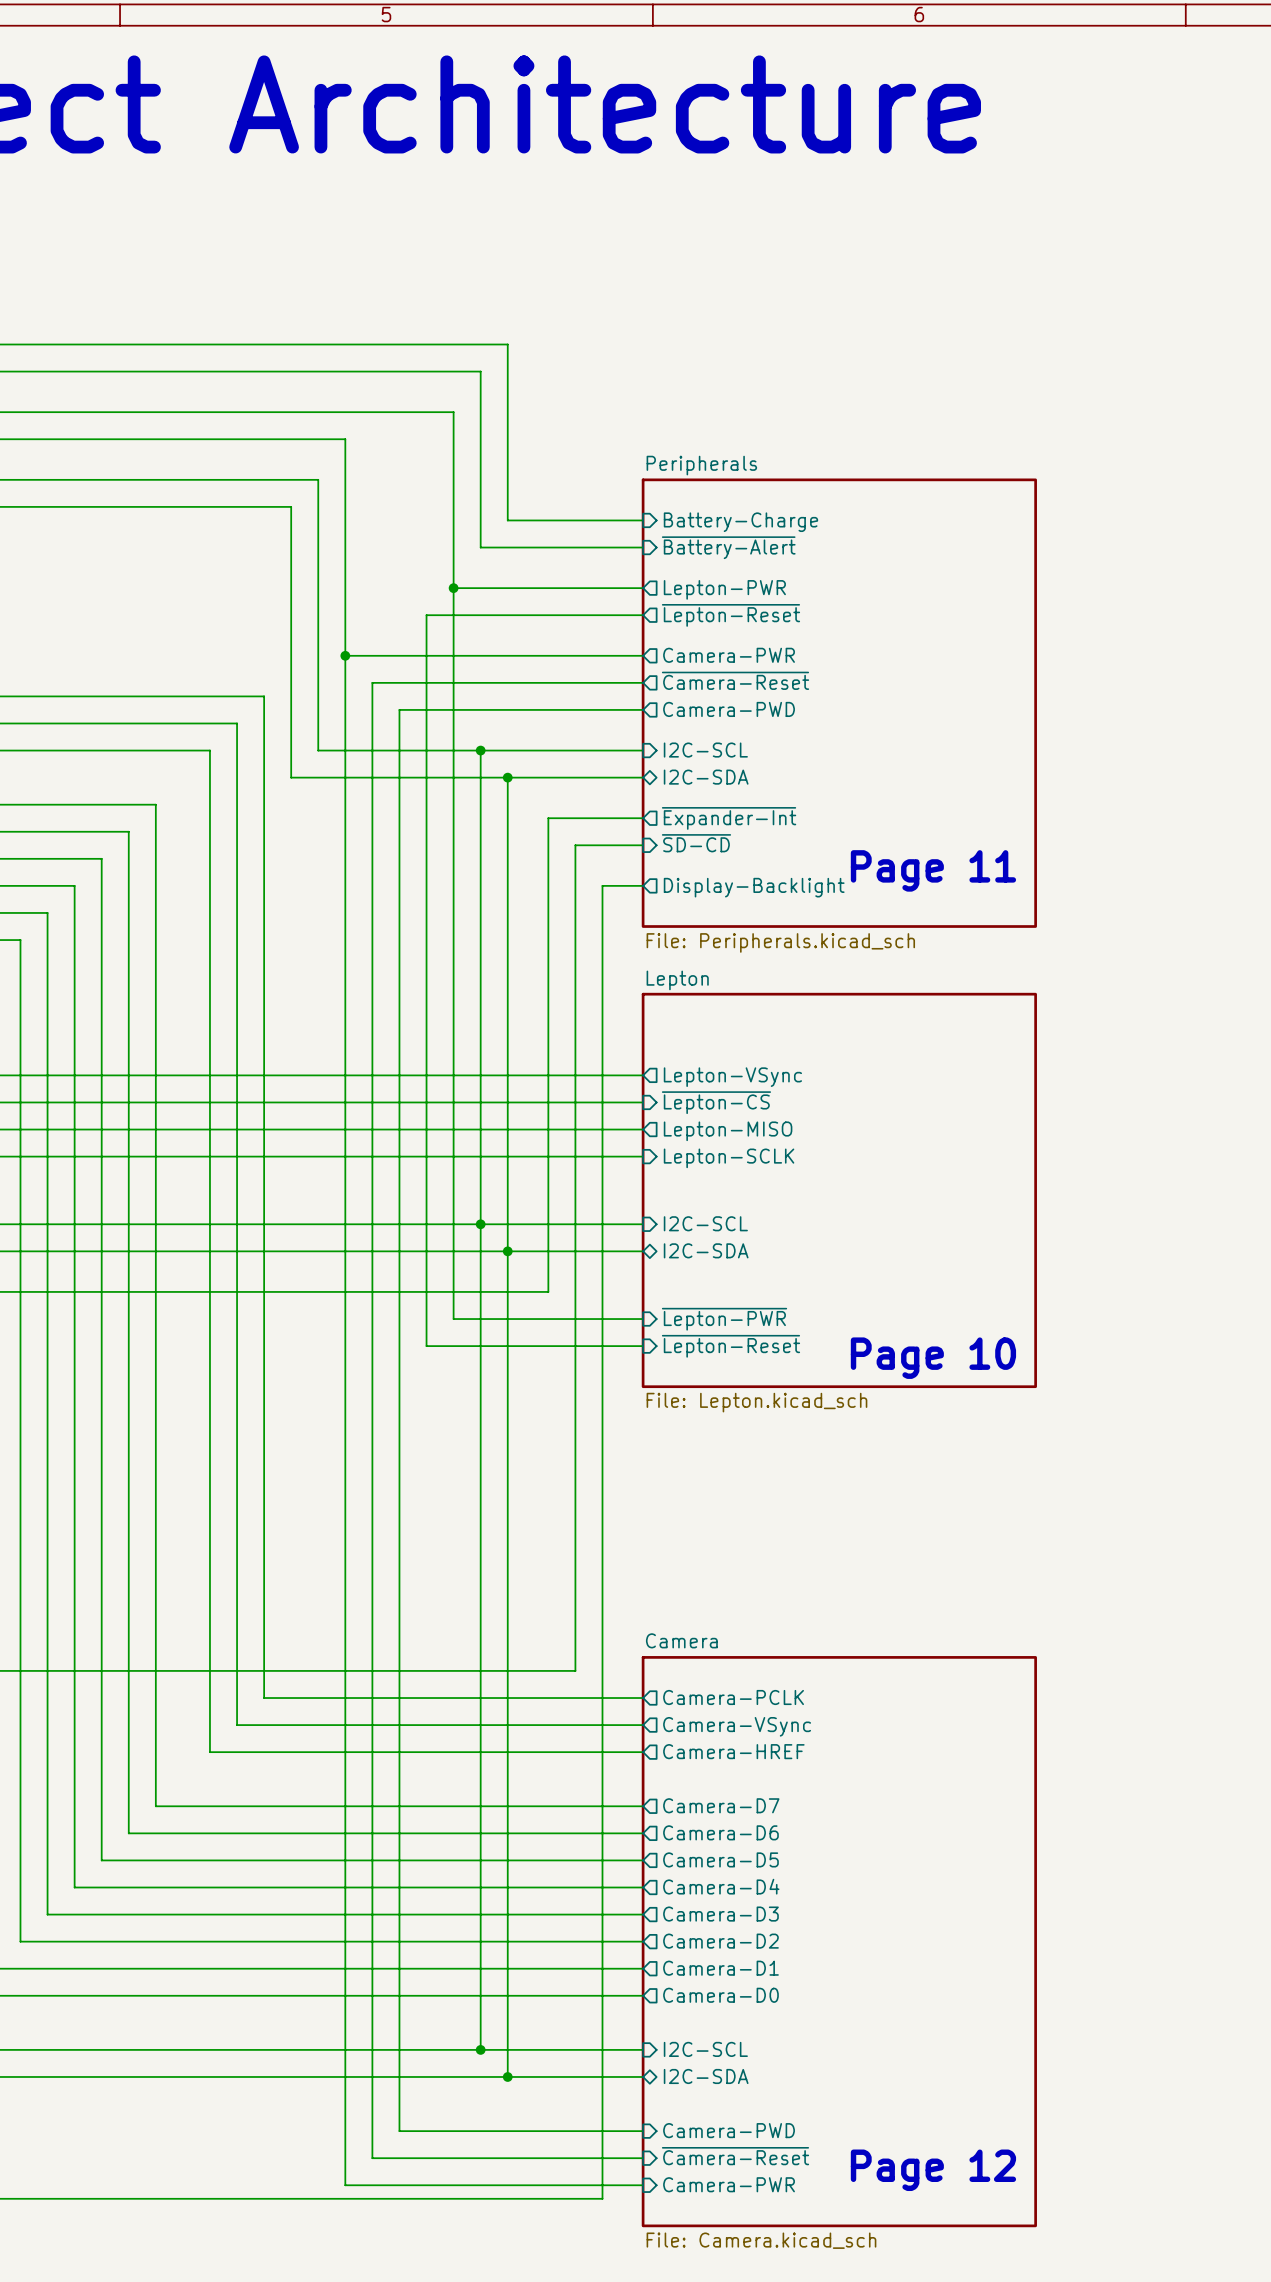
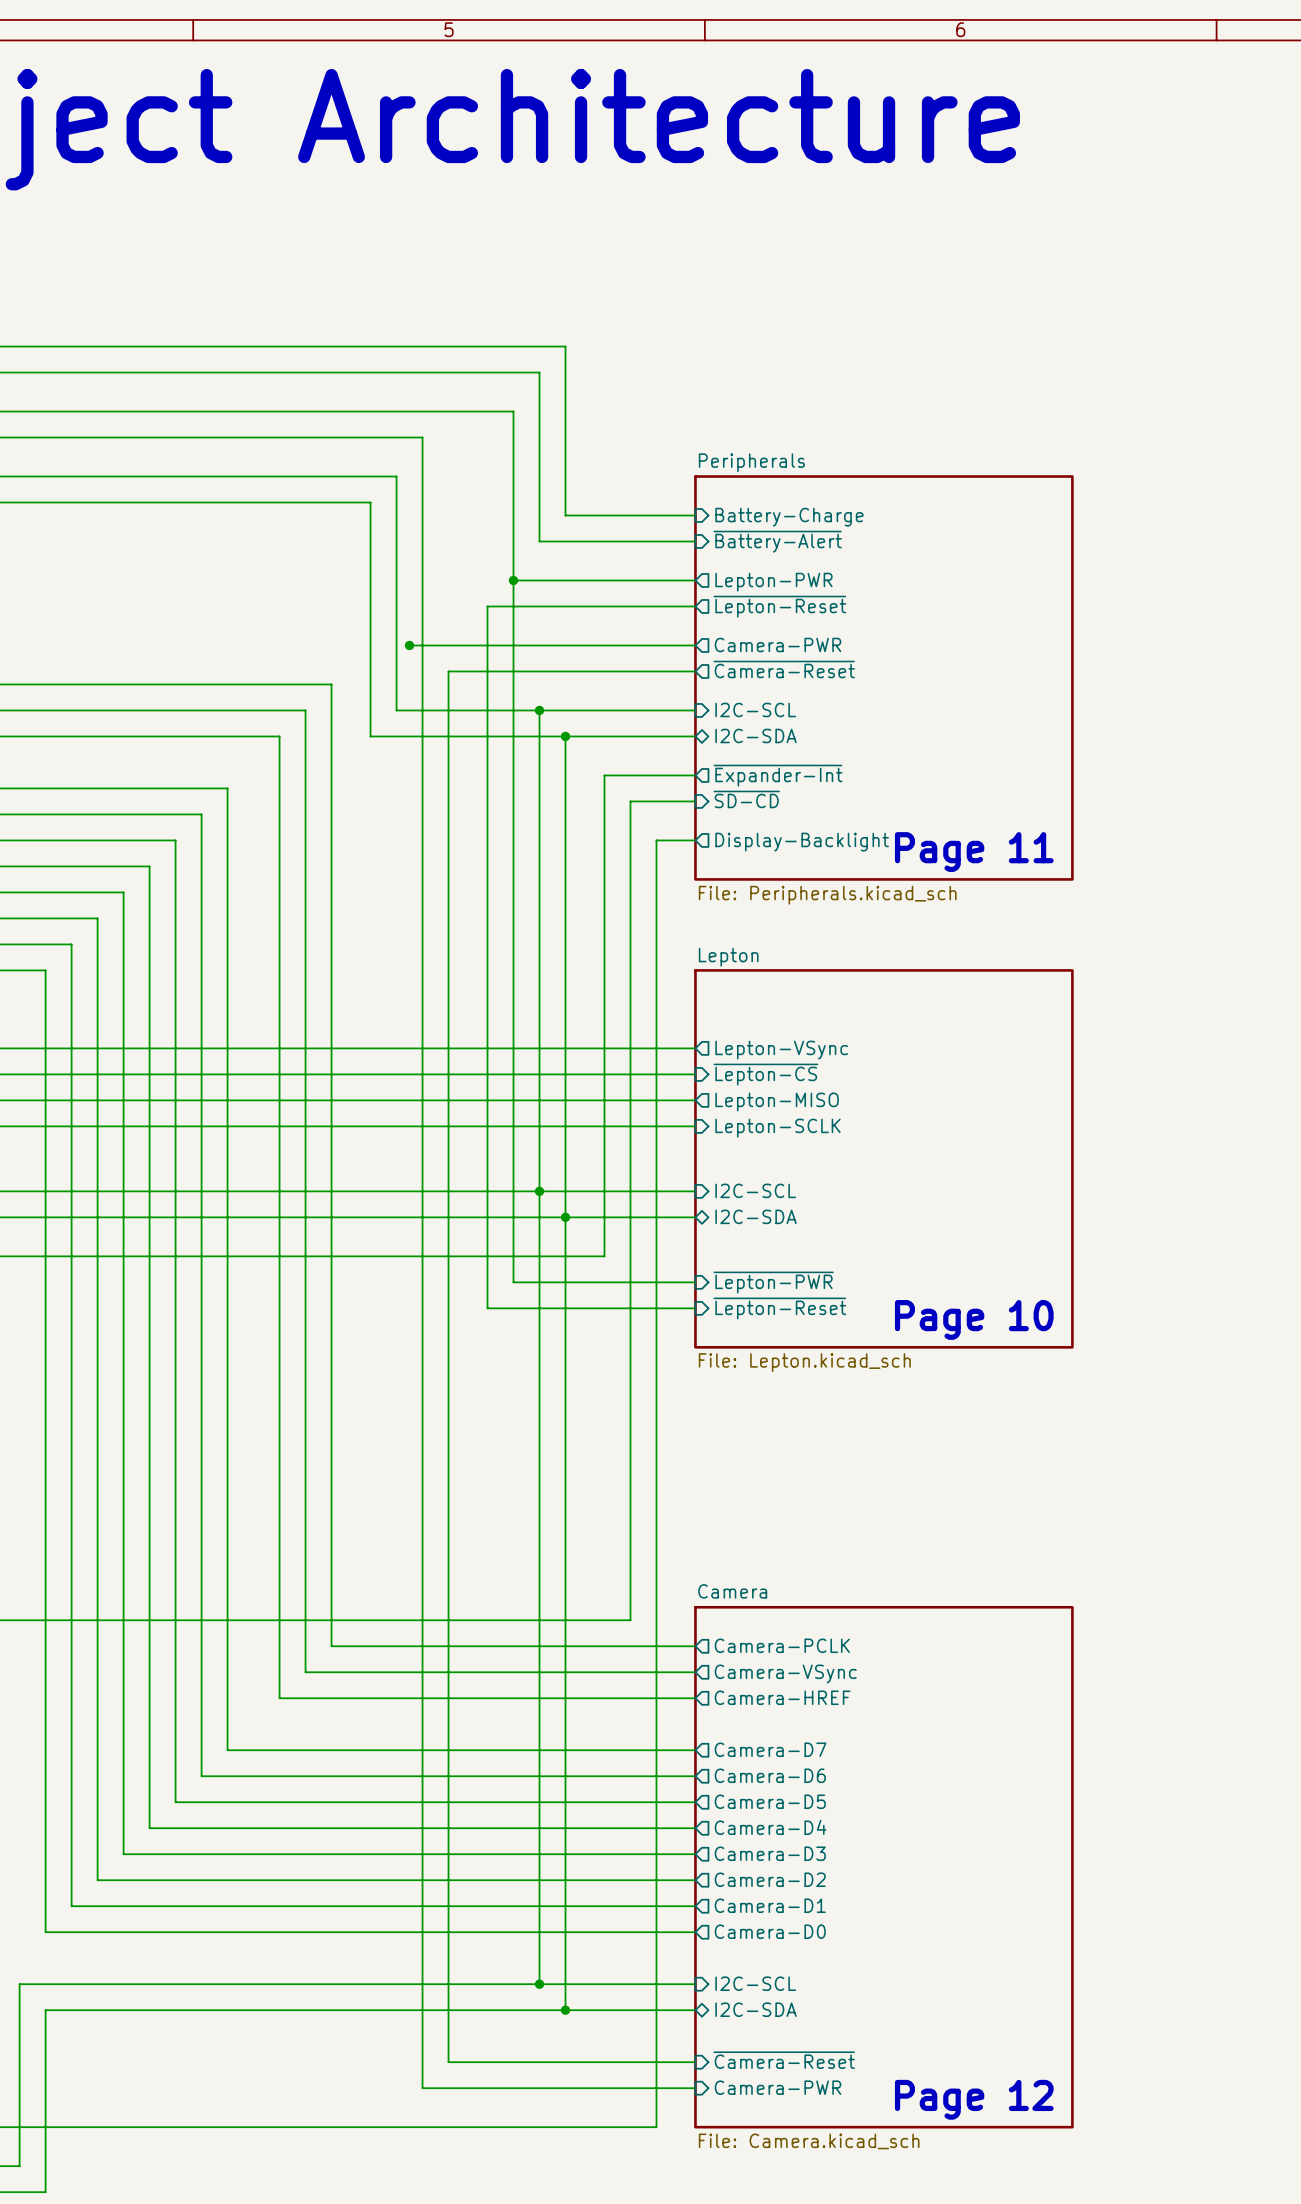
wire: (345, 439) (345, 2185) (643, 2185) -> (409, 437) (422, 437) (422, 2088) (435, 2088)
wire: (318, 479) (318, 750) -> (357, 502) (370, 502) (370, 736) (383, 736)
wire: none -> (383, 476) (396, 476) (396, 710) (695, 710)
wire: (291, 506) (291, 777) (643, 777) -> none
wire: (385, 682) (372, 682) (372, 2158) -> (448, 671) (448, 2062) (461, 2062)
sheet Peripherals: none -> File: Peripherals.kicad_sch (883, 677)
sheet Peripherals: File: Peripherals.kicad_sch (839, 703) -> none
wire: (643, 709) (399, 709) (399, 2131) -> none
sheet pin: Camera-PWD (729, 709) -> none
sheet pin: none -> I2C-SCL (755, 709)
wire: none -> (539, 710) (539, 736)
junction: none -> (539, 710)
junction: (480, 750) -> none
wire: none -> (565, 736) (565, 762)
junction: none -> (565, 736)
sheet pin shape: input (705, 750) -> bidirectional (756, 735)
sheet pin: I2C-SCL (705, 750) -> I2C-SDA (756, 735)
junction: (507, 777) -> none
sheet pin: I2C-SDA (706, 777) -> none
wire: none -> (695, 775) (604, 775) (604, 801)
sheet pin: none -> ~{Expander-Int} (778, 775)
wire: (548, 818) (575, 818) -> (630, 827) (630, 801)
sheet pin shape: output (729, 818) -> input (746, 799)
sheet pin: ~{Expander-Int} (729, 818) -> ~{SD-CD} (746, 799)
sheet pin: ~{SD-CD} (696, 843) -> none
wire: (575, 845) (643, 845) -> none
wire: (602, 885) (643, 885) -> (656, 866) (656, 840) (695, 840)
sheet pin position: Display-Backlight (754, 887) -> Display-Backlight (802, 842)
sheet Camera: none -> File: Camera.kicad_sch (883, 1867)
sheet Camera: File: Camera.kicad_sch (839, 1941) -> none
sheet pin: Camera-PWD (729, 2130) -> ~{Camera-Reset} (784, 2060)
sheet pin: ~{Camera-Reset} (735, 2156) -> Camera-PWR (777, 2087)
sheet pin: Camera-PWR (729, 2184) -> none

